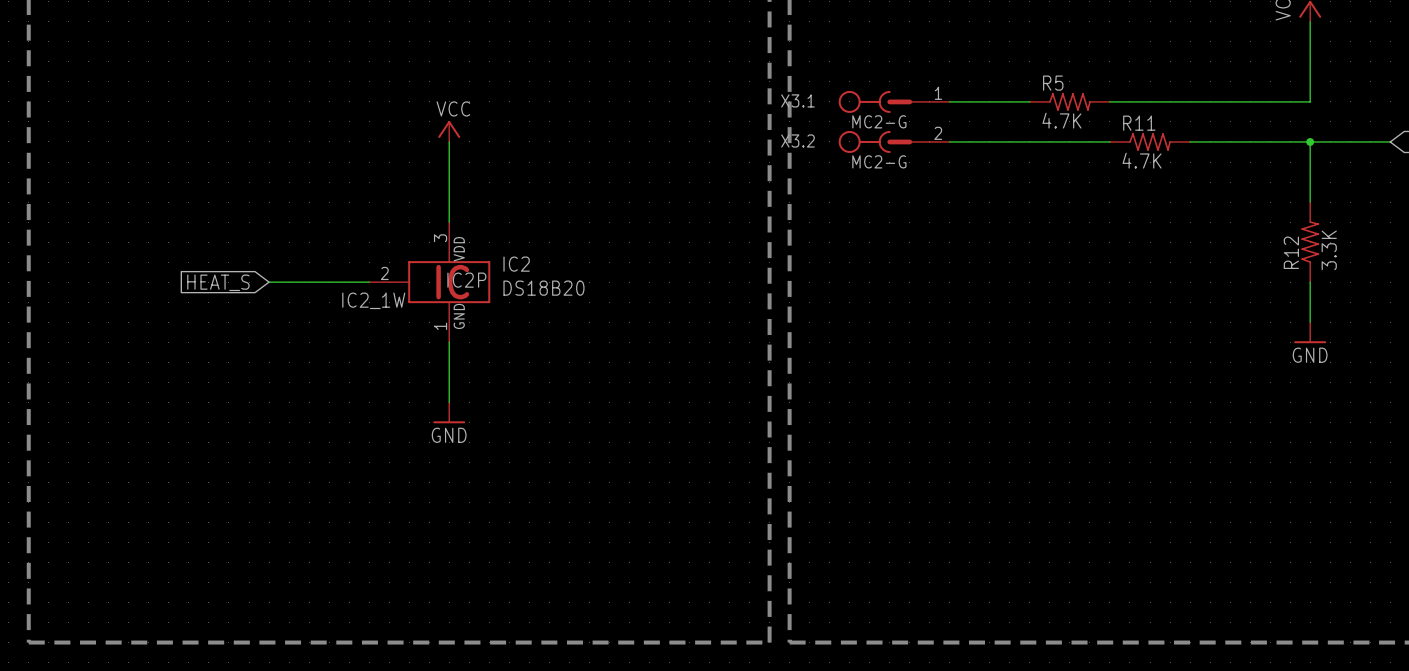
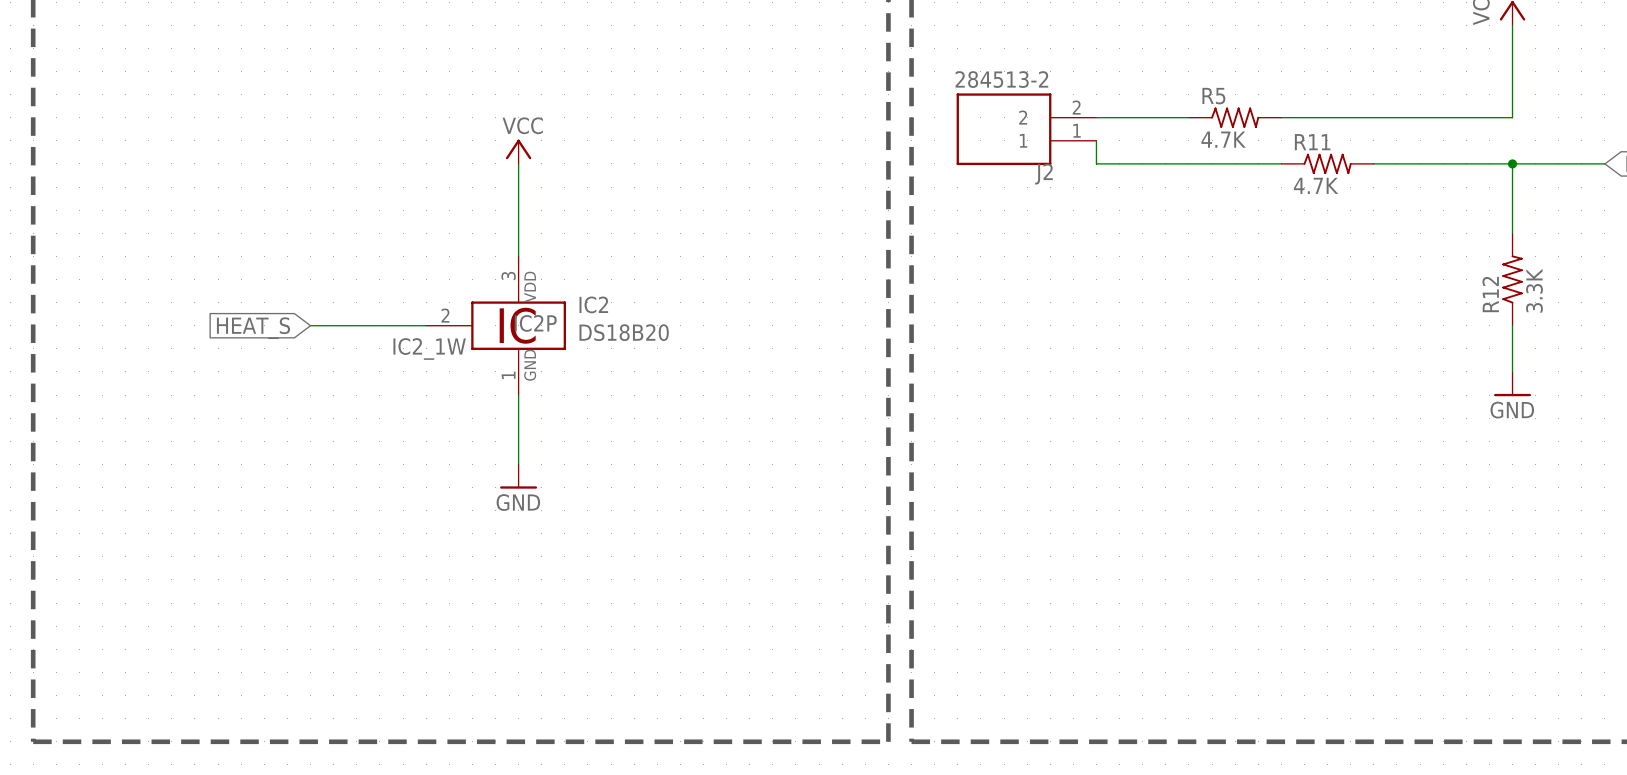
X3.1: MC2-G (894, 101) -> none
J2: none -> 284513-2 (1026, 129)
wire: none -> (1096, 140) (1096, 163)
X3.2: MC2-G (894, 141) -> none

